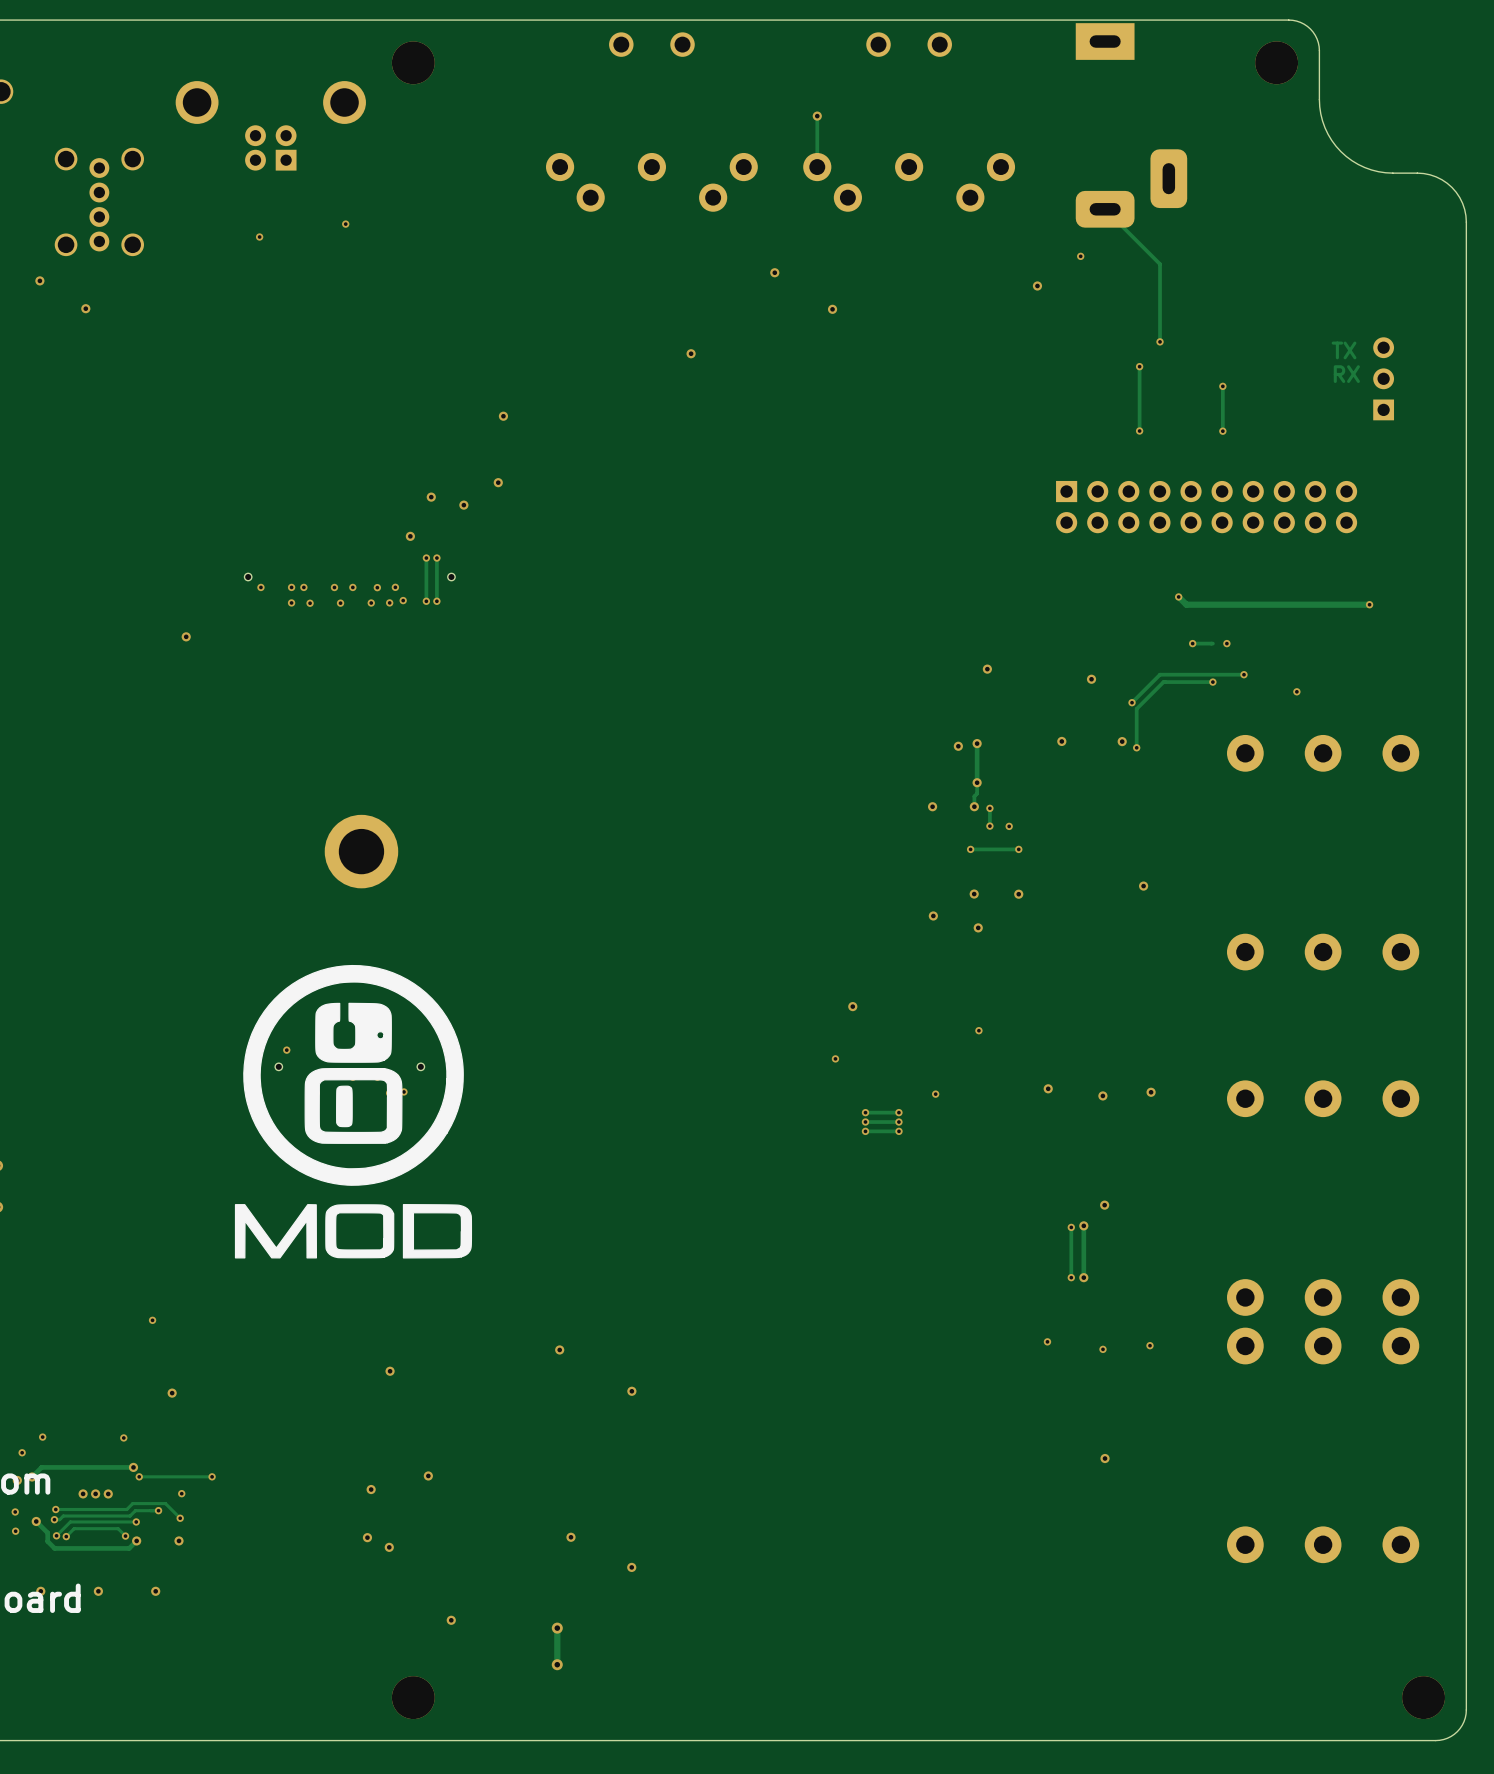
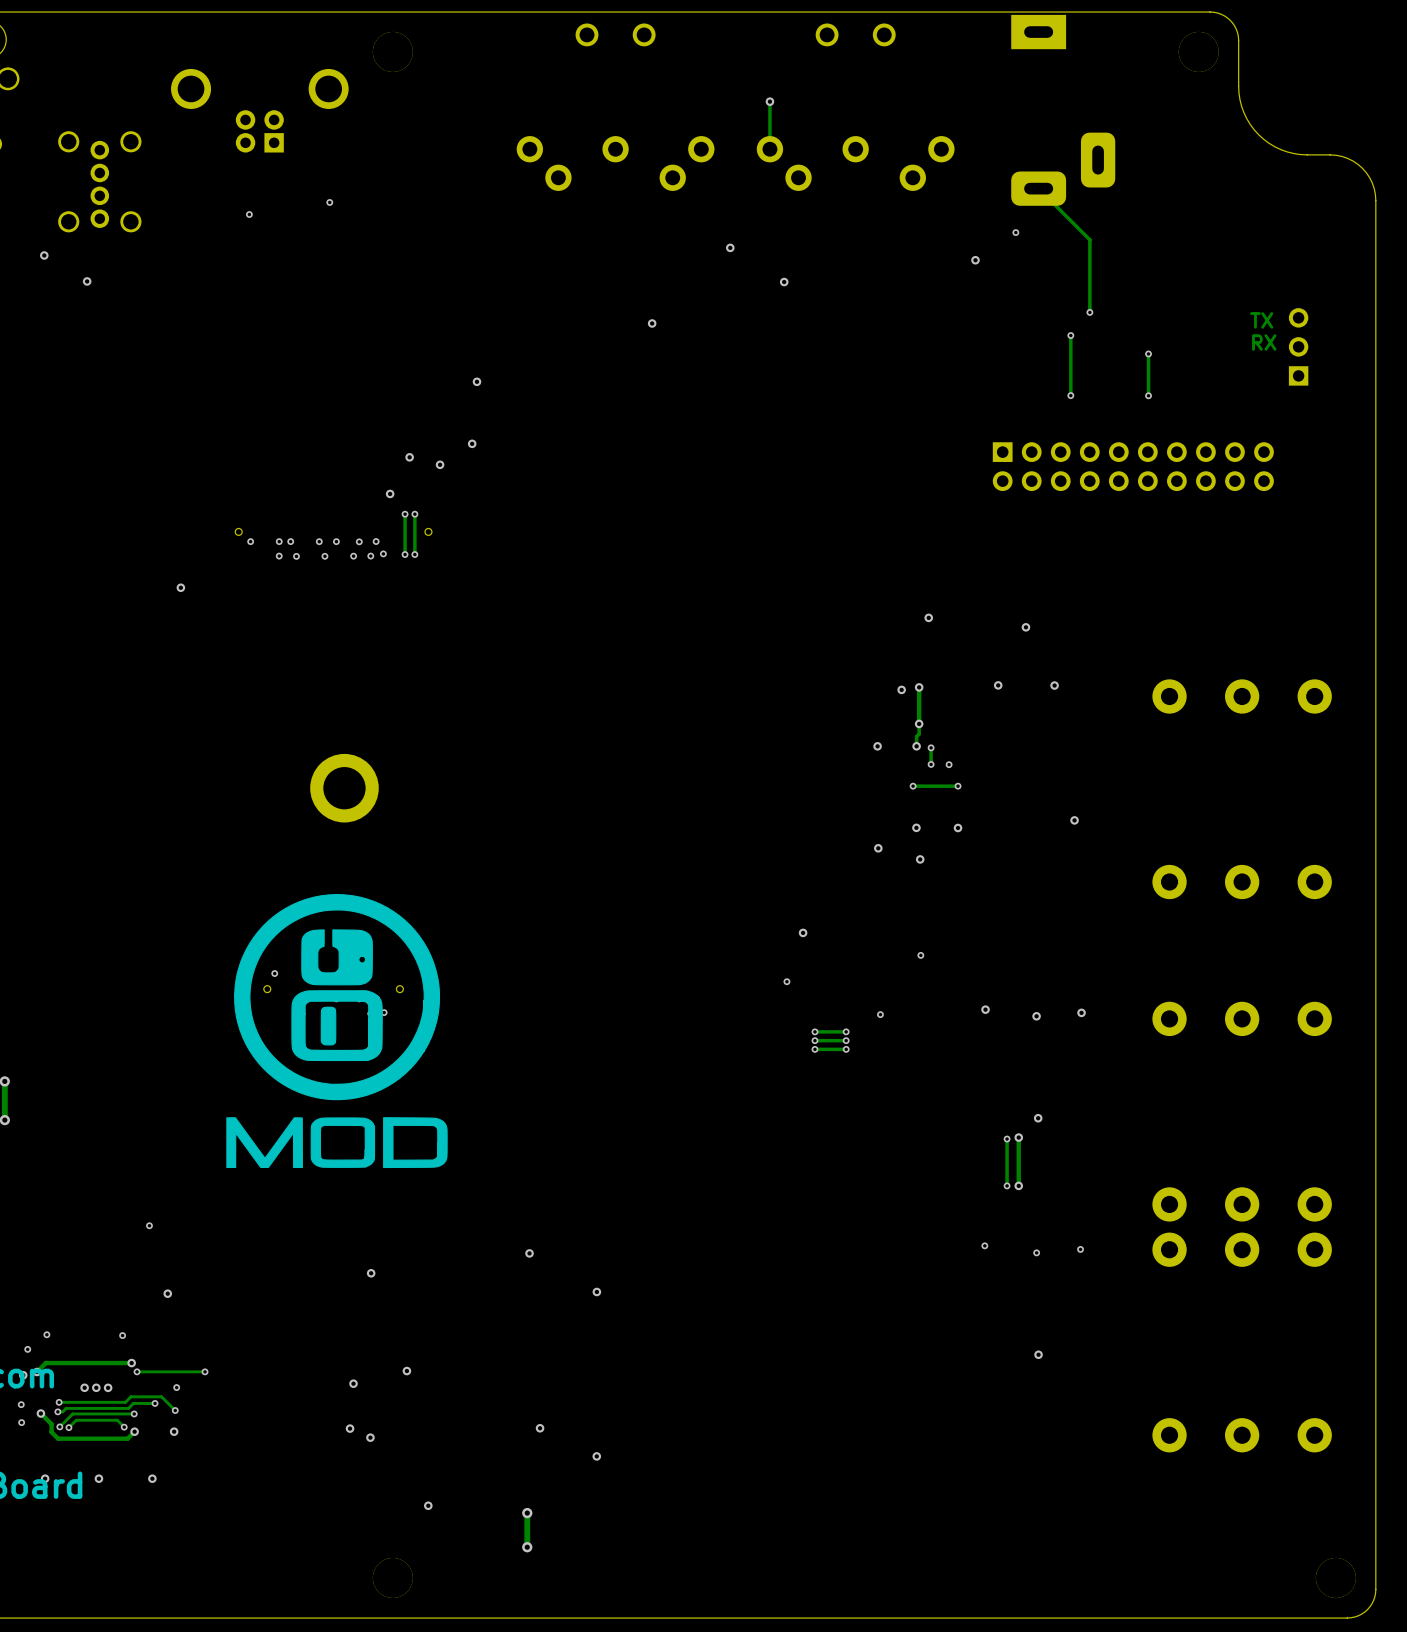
track: (1178, 596) (1186, 604) (1369, 604) -> none
via: (1178, 596) -> none
via: (1369, 604) -> none
via: (1192, 643) -> none
track: (1212, 643) (1192, 643) -> none
via: (1226, 643) -> none
track: (1243, 674) (1160, 674) (1132, 702) -> none
via: (1243, 674) -> none
track: (1212, 682) (1163, 682) (1136, 708) (1136, 747) -> none
via: (1212, 682) -> none
via: (1296, 691) -> none
via: (1132, 702) -> none
via: (1136, 747) -> none

